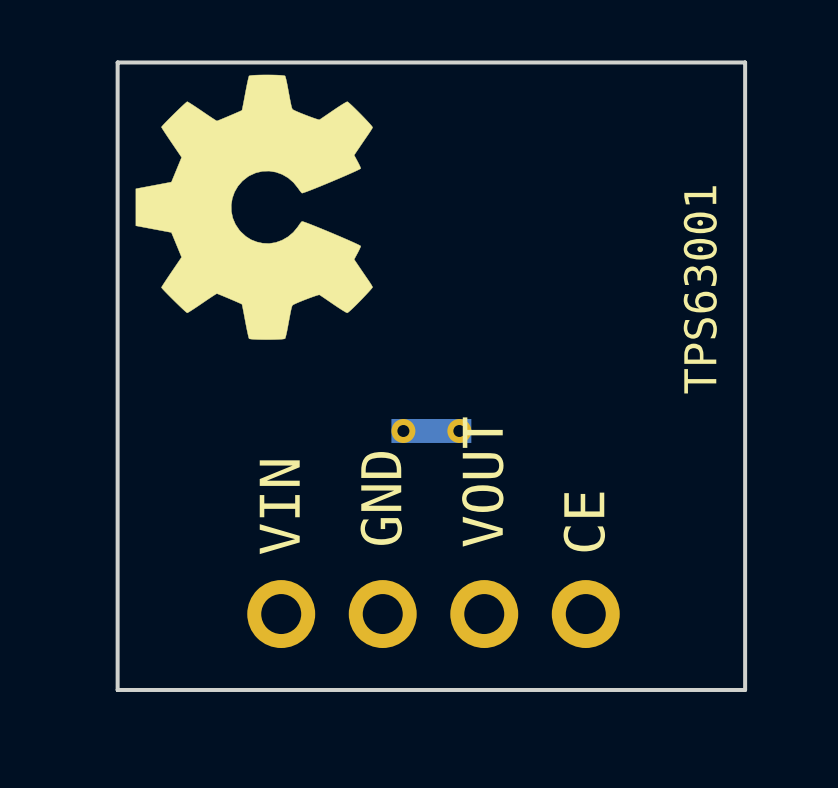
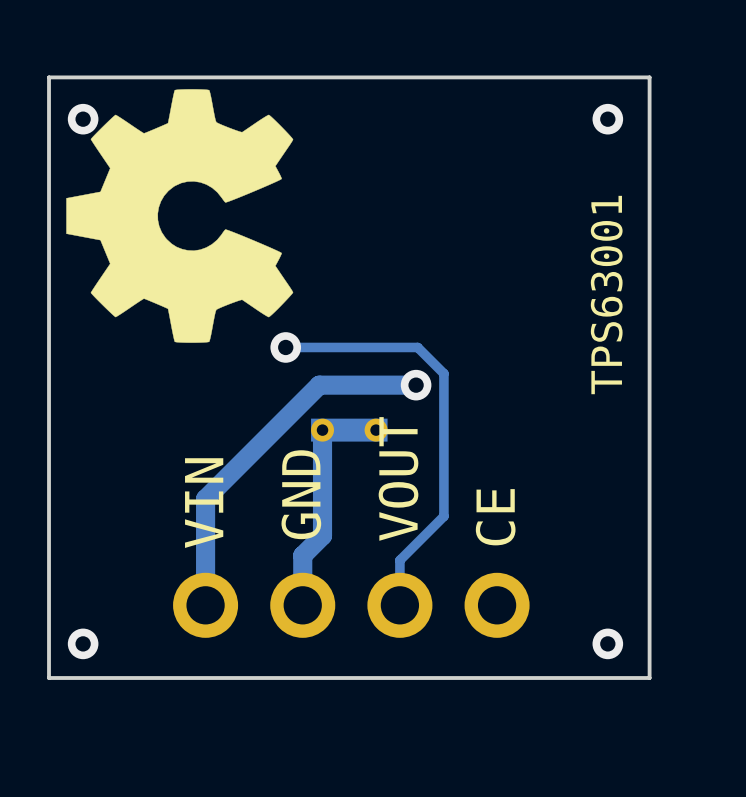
via: none -> (83, 119)
via: none -> (607, 119)
track: none -> (285, 347) (417, 347) (443, 373) (443, 516) (399, 560) (399, 605)
via: none -> (285, 347)
track: none -> (416, 385) (319, 385) (205, 498) (205, 605)
via: none -> (416, 385)
track: none -> (349, 430) (322, 430) (322, 535) (302, 555) (302, 605)
via: none -> (83, 643)
via: none -> (607, 643)

